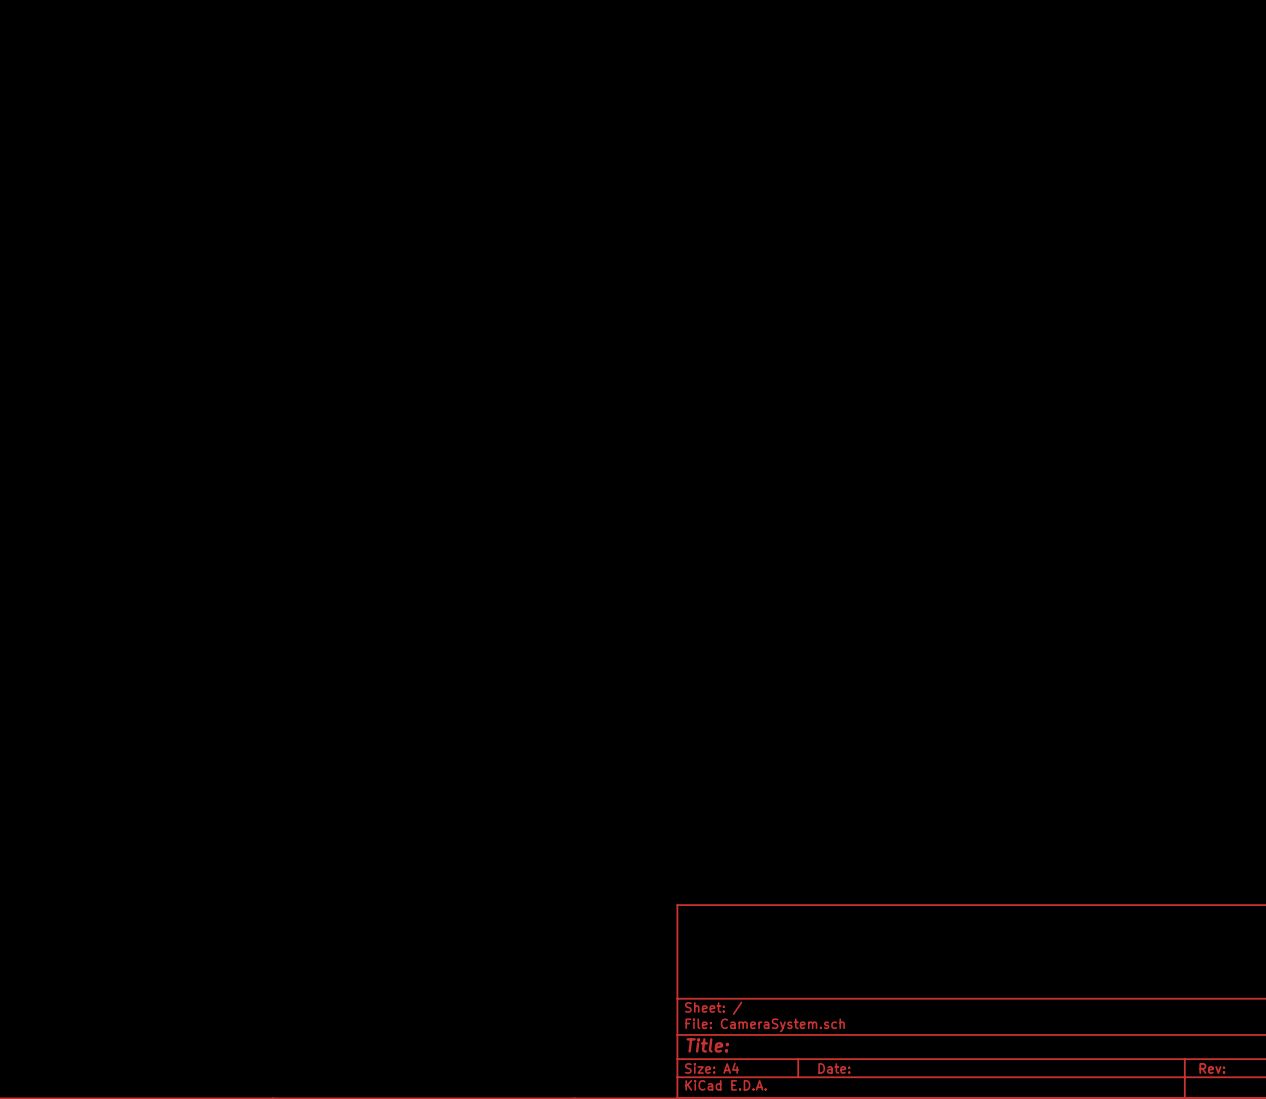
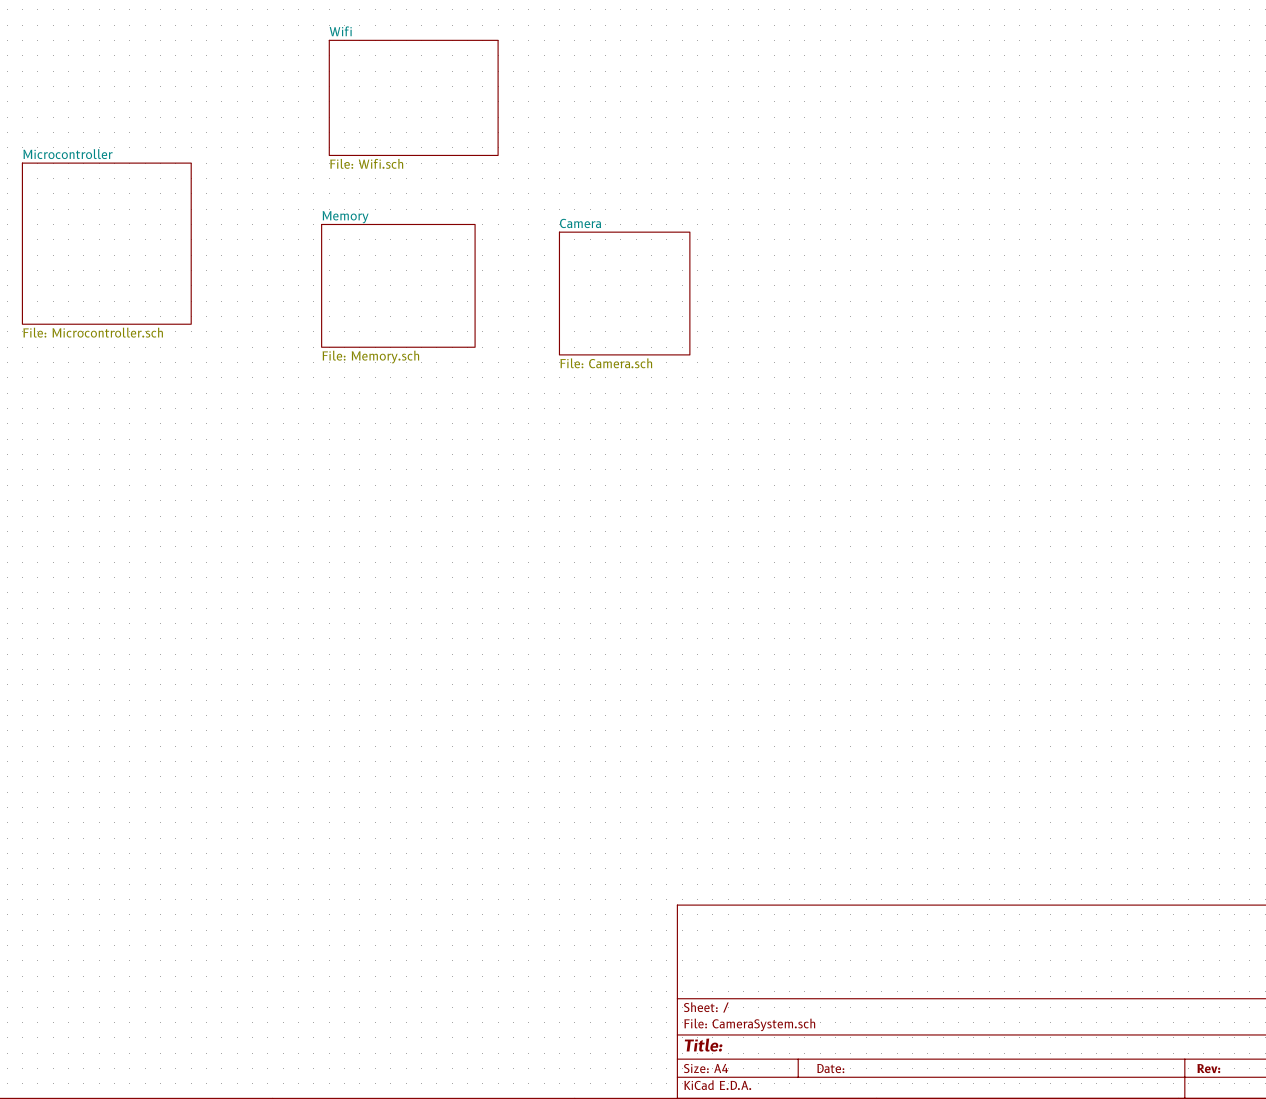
sheet Wifi: none -> File: Wifi.sch (413, 97)
sheet Microcontroller: none -> File: Microcontroller.sch (106, 243)
sheet Memory: none -> File: Memory.sch (398, 285)
sheet Camera: none -> File: Camera.sch (624, 293)

